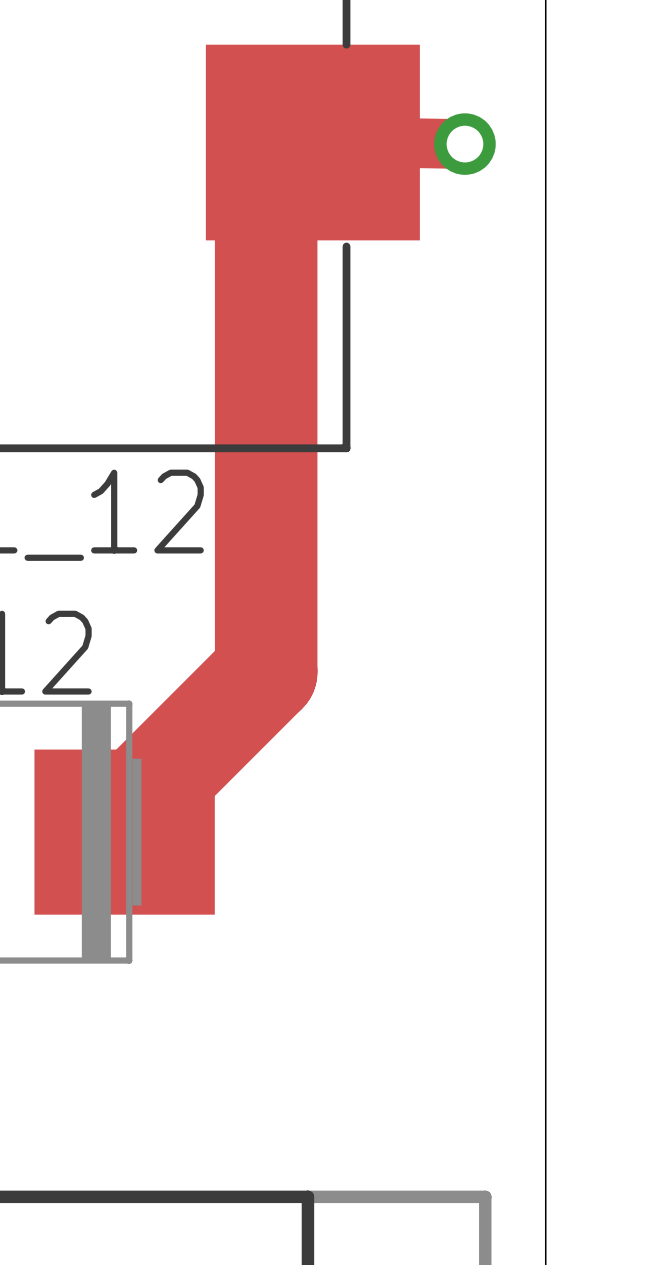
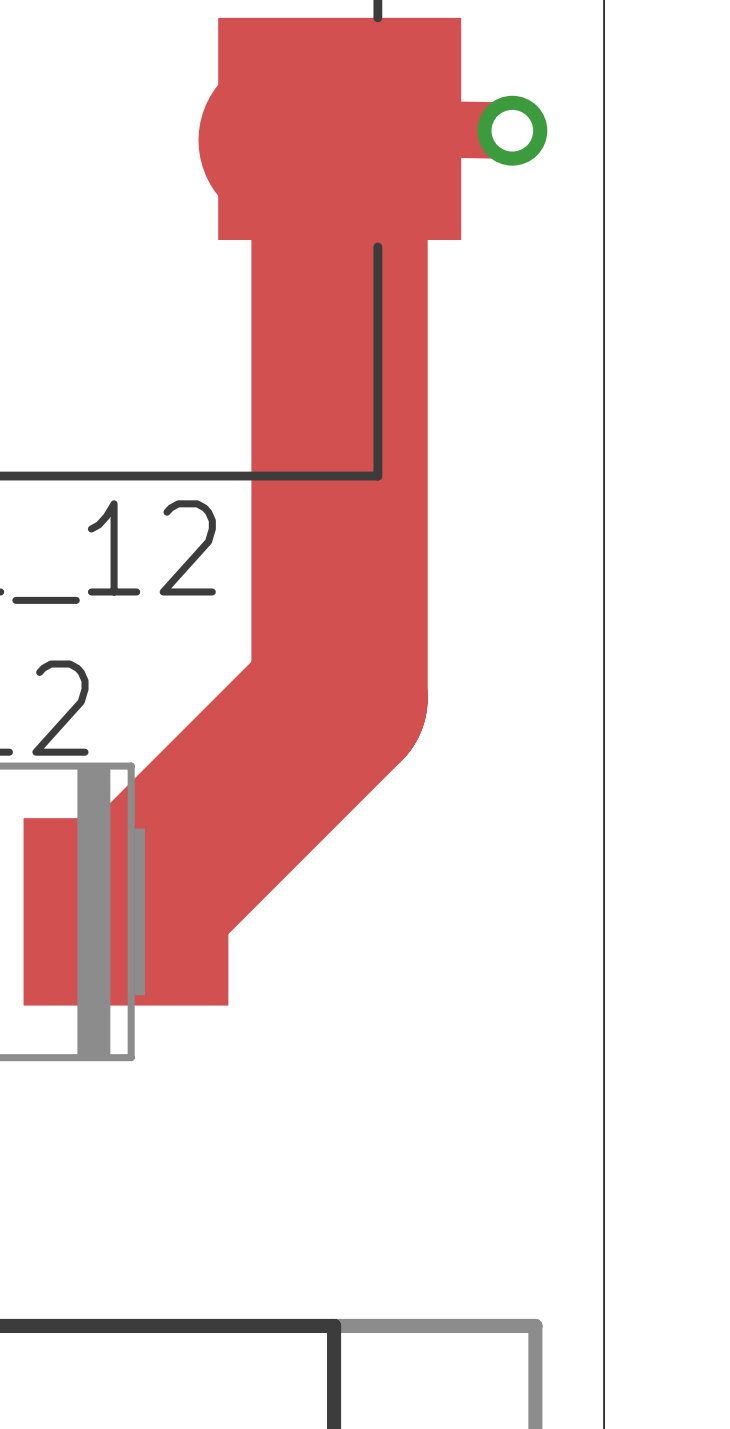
track: (266, 152) (266, 672) (124, 813) -> (286, 140) (339, 140) (339, 698) (125, 911)

